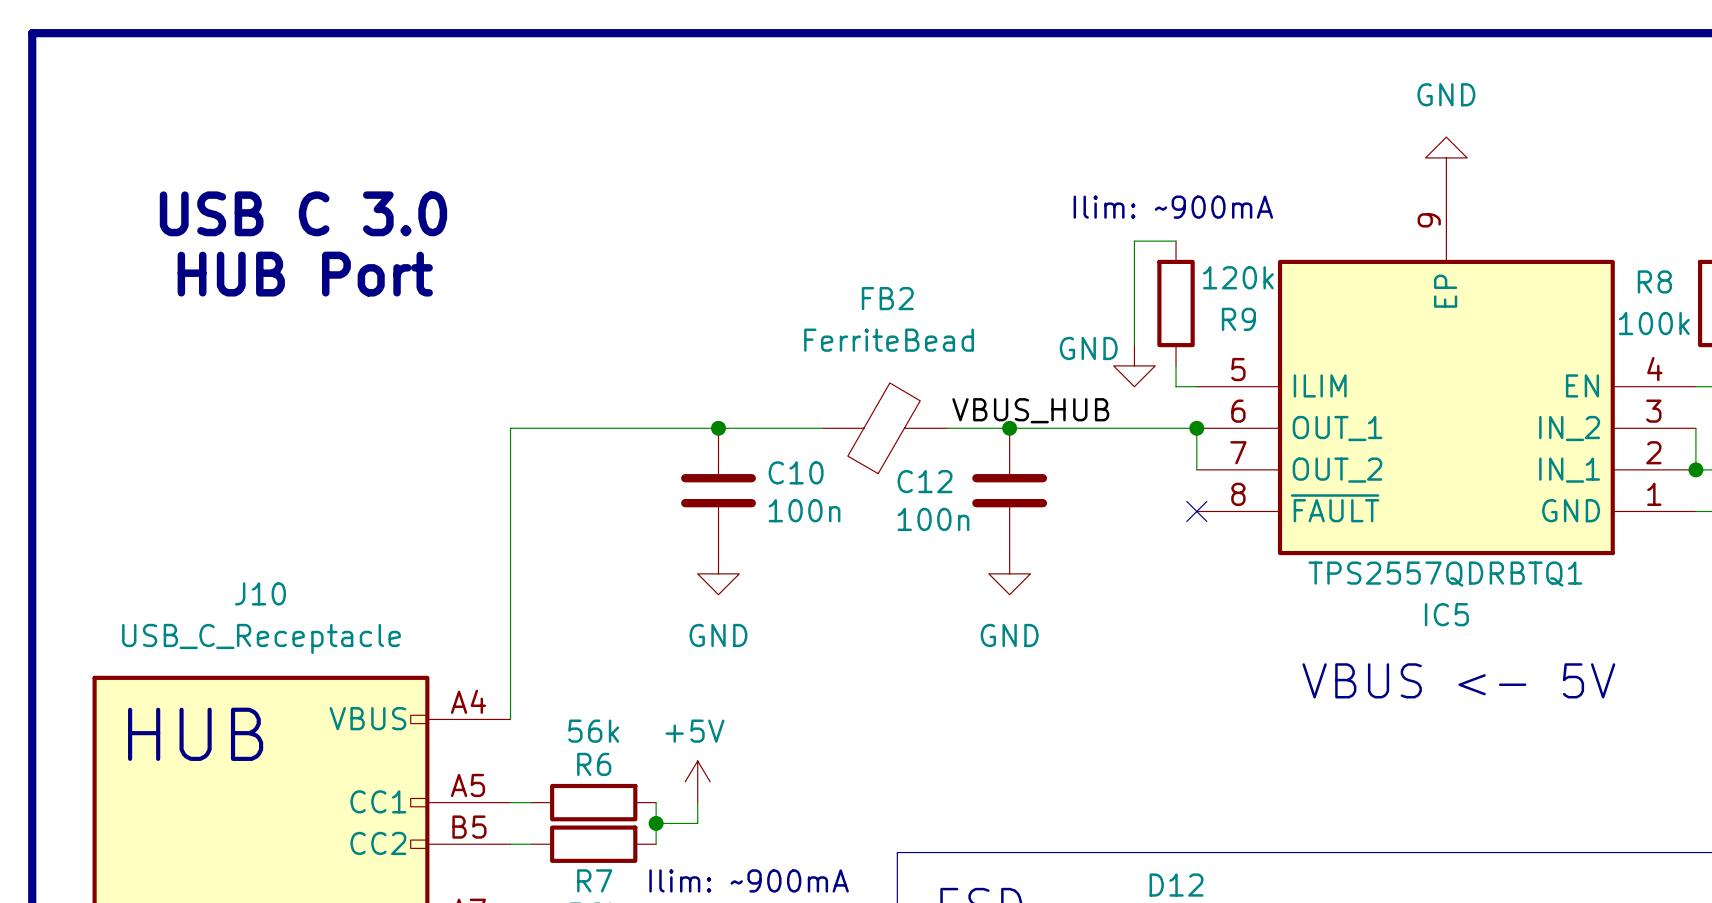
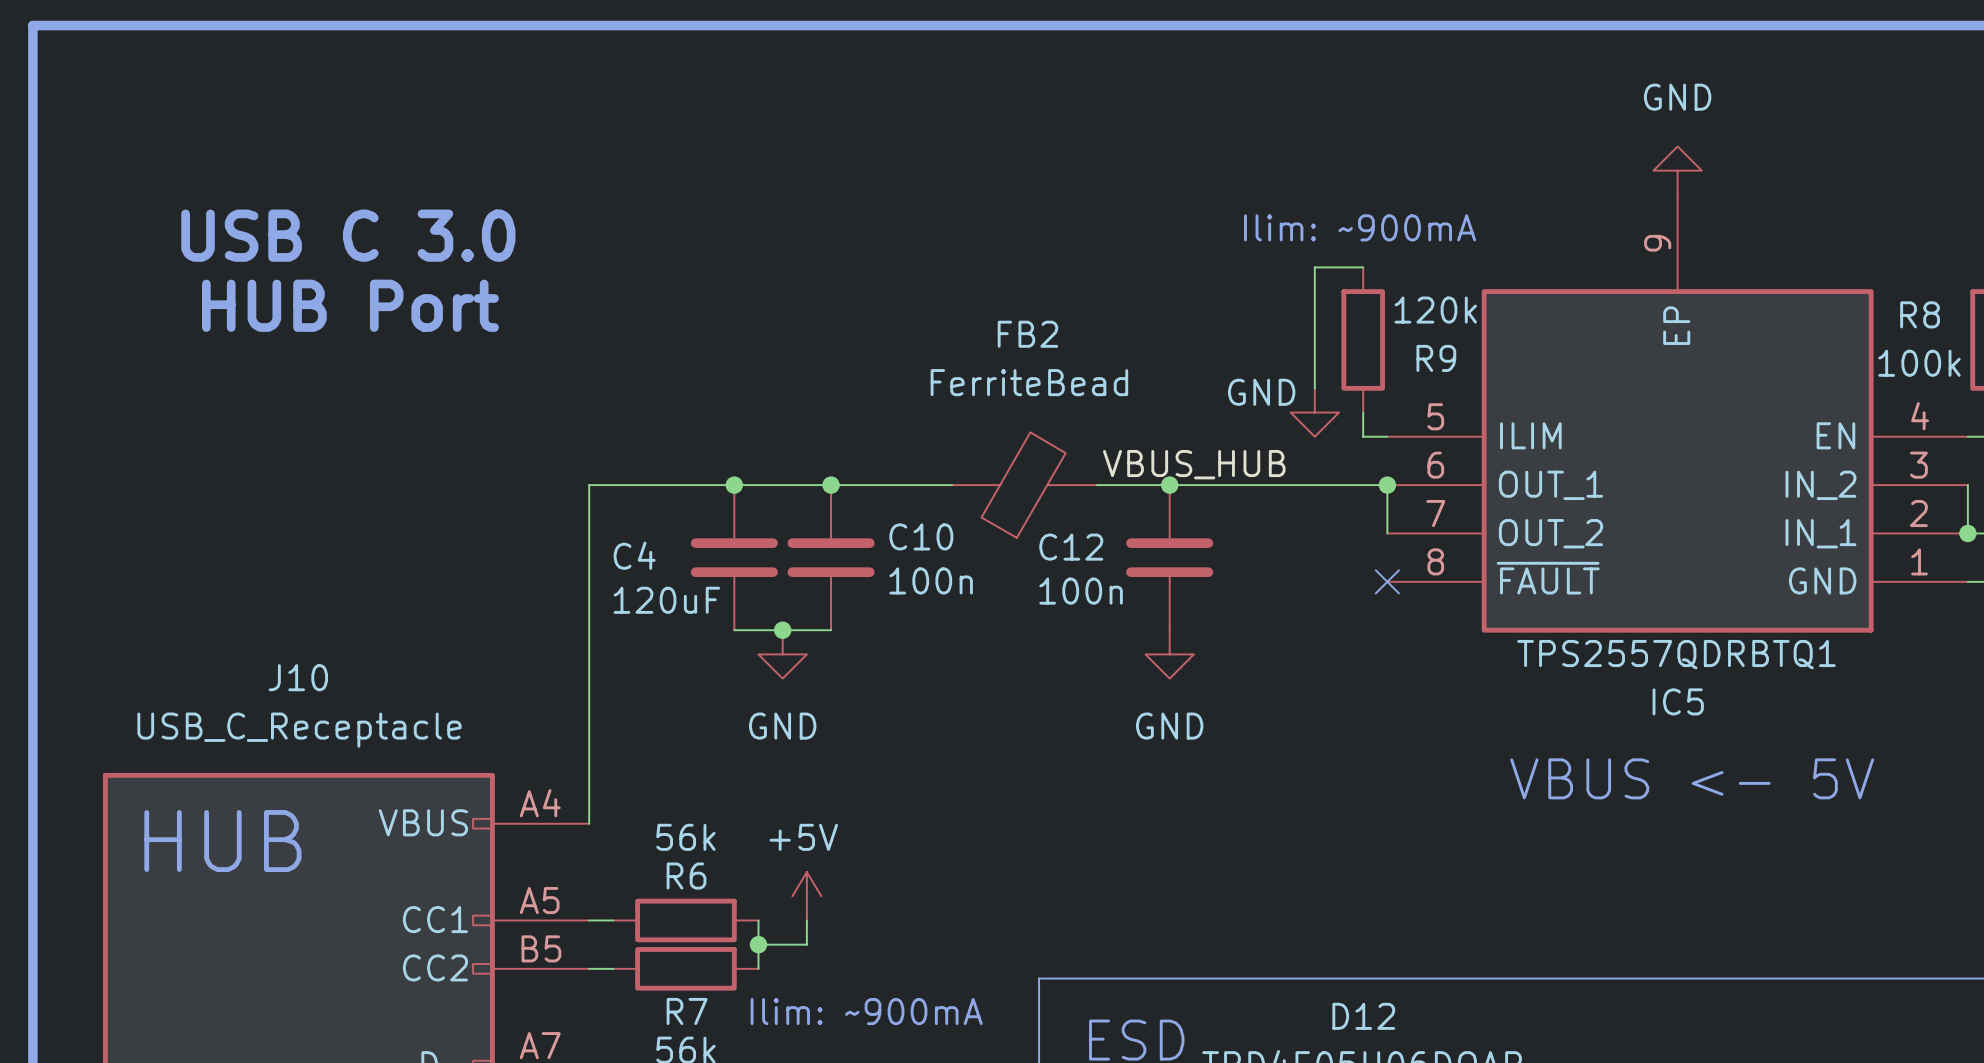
junction: none -> (734, 485)
C4: none -> 120uF (734, 557)
wire: none -> (734, 630) (831, 630)
junction: none -> (782, 630)
power symbol position: GND (718, 573) -> GND (782, 654)

